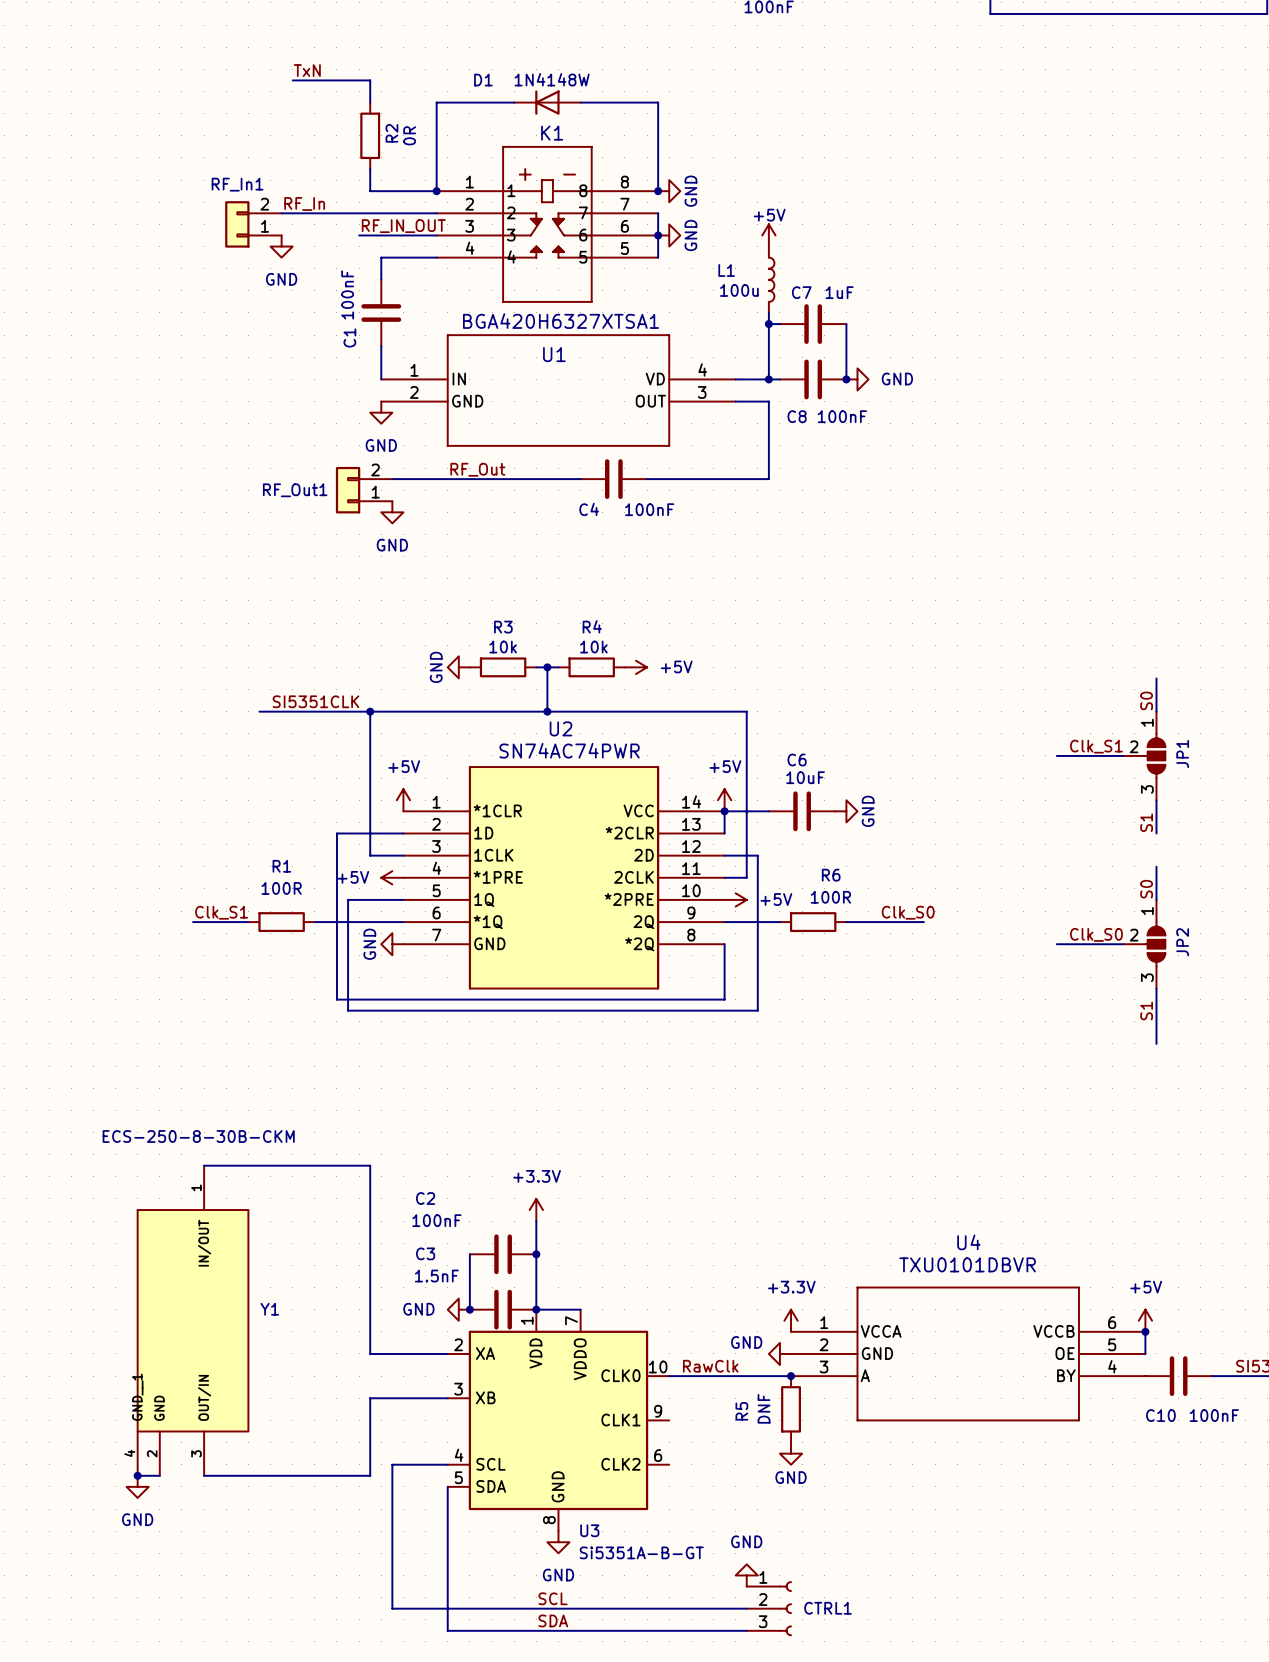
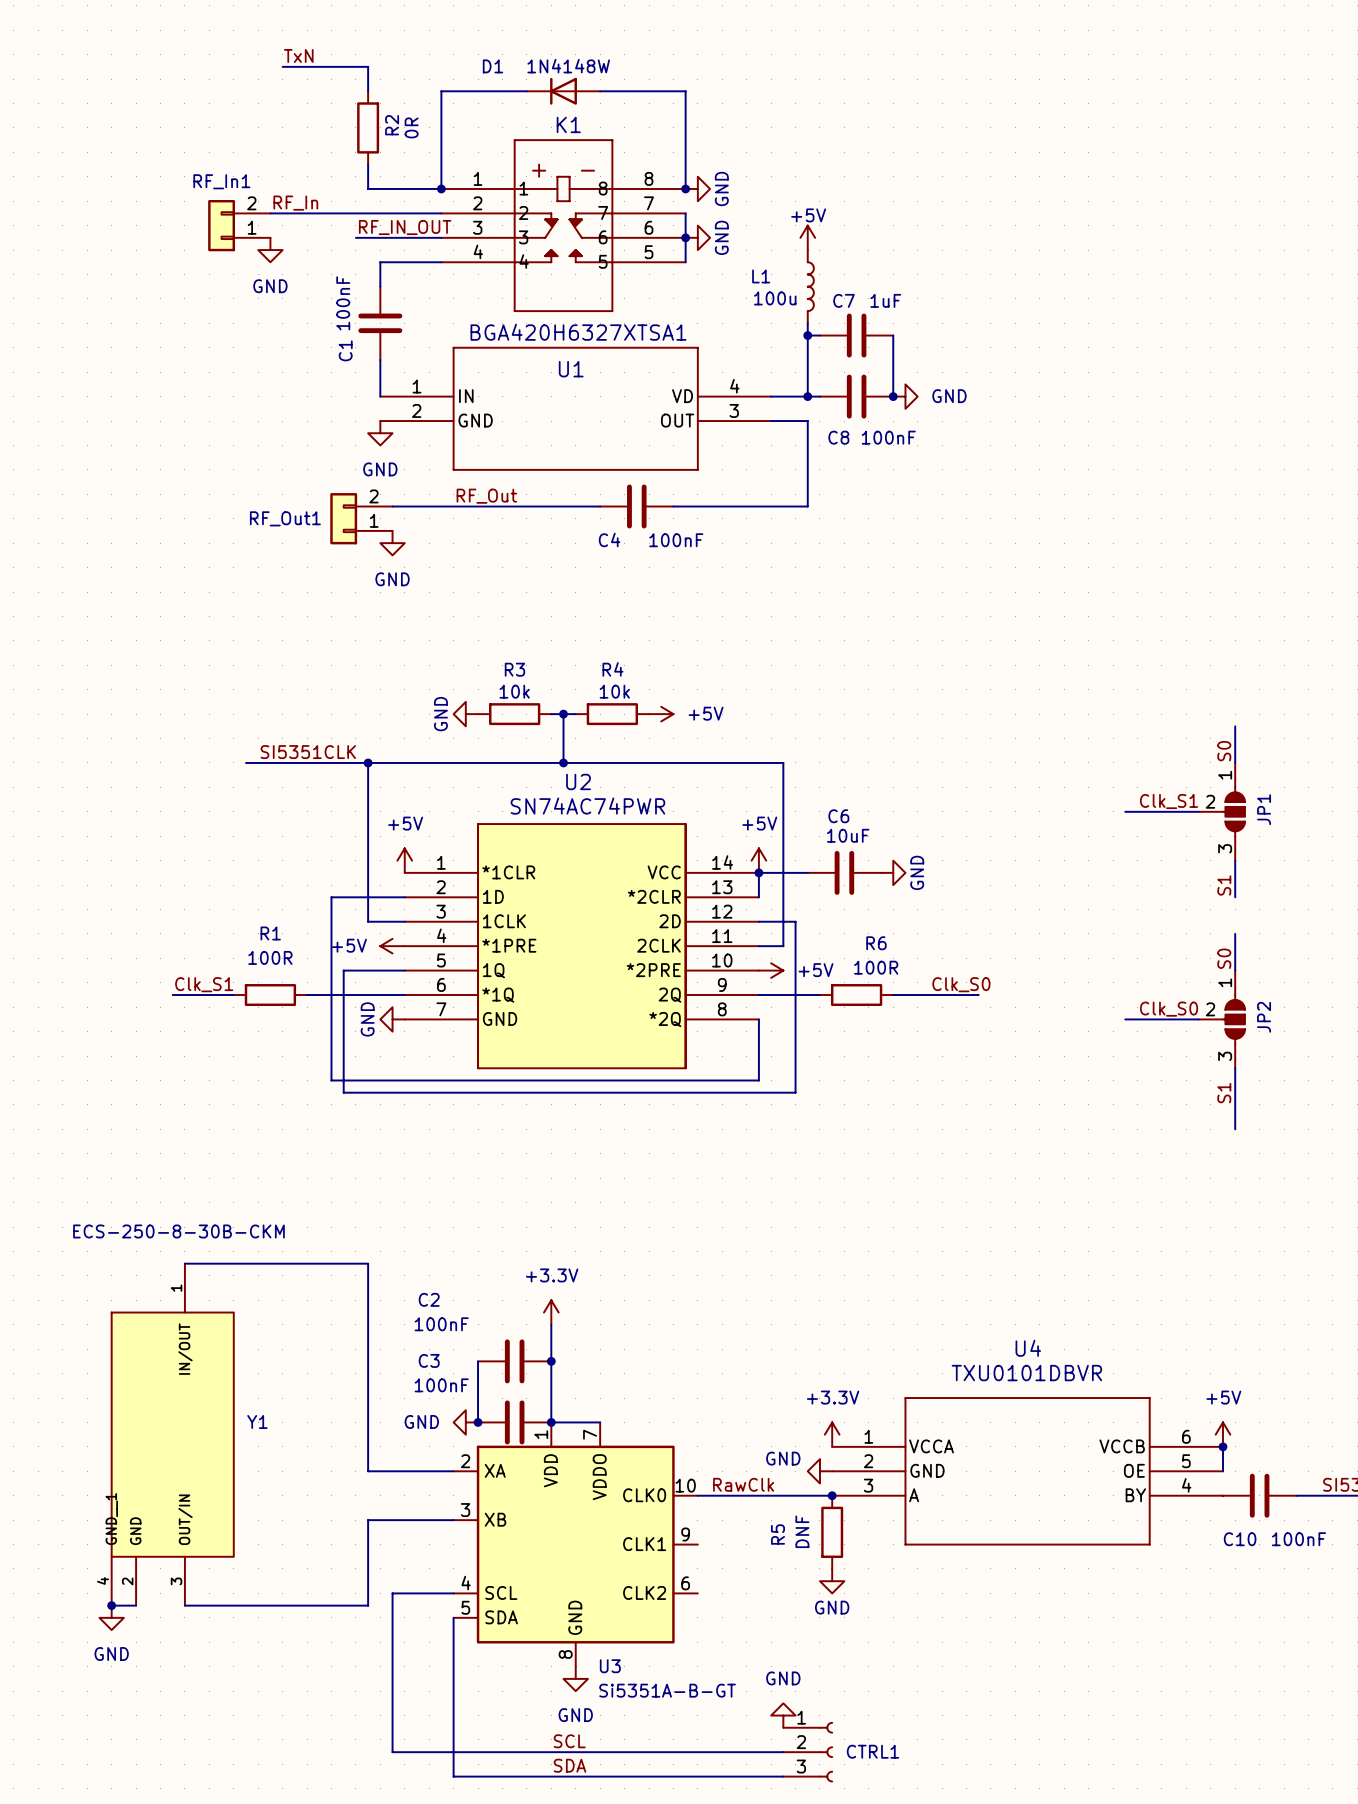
C3 value: 1.5nF (436, 1276) -> 100nF (441, 1385)

